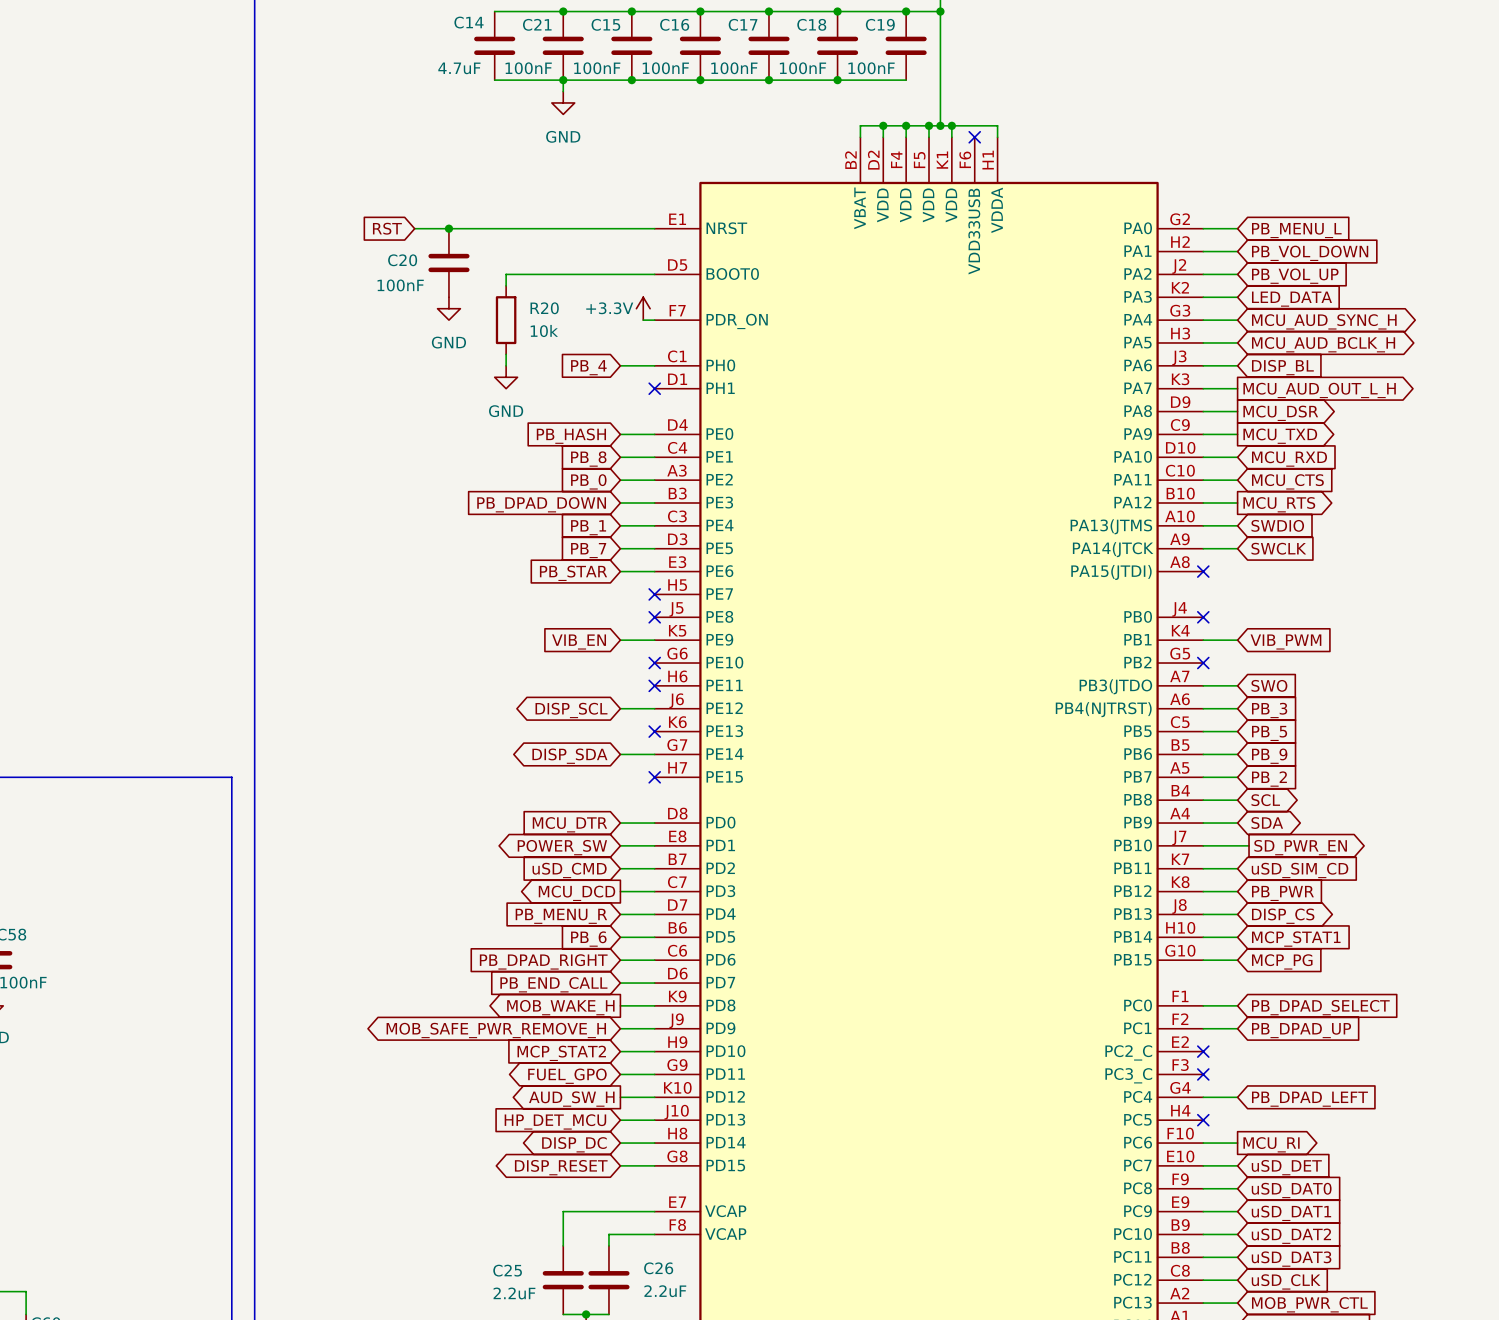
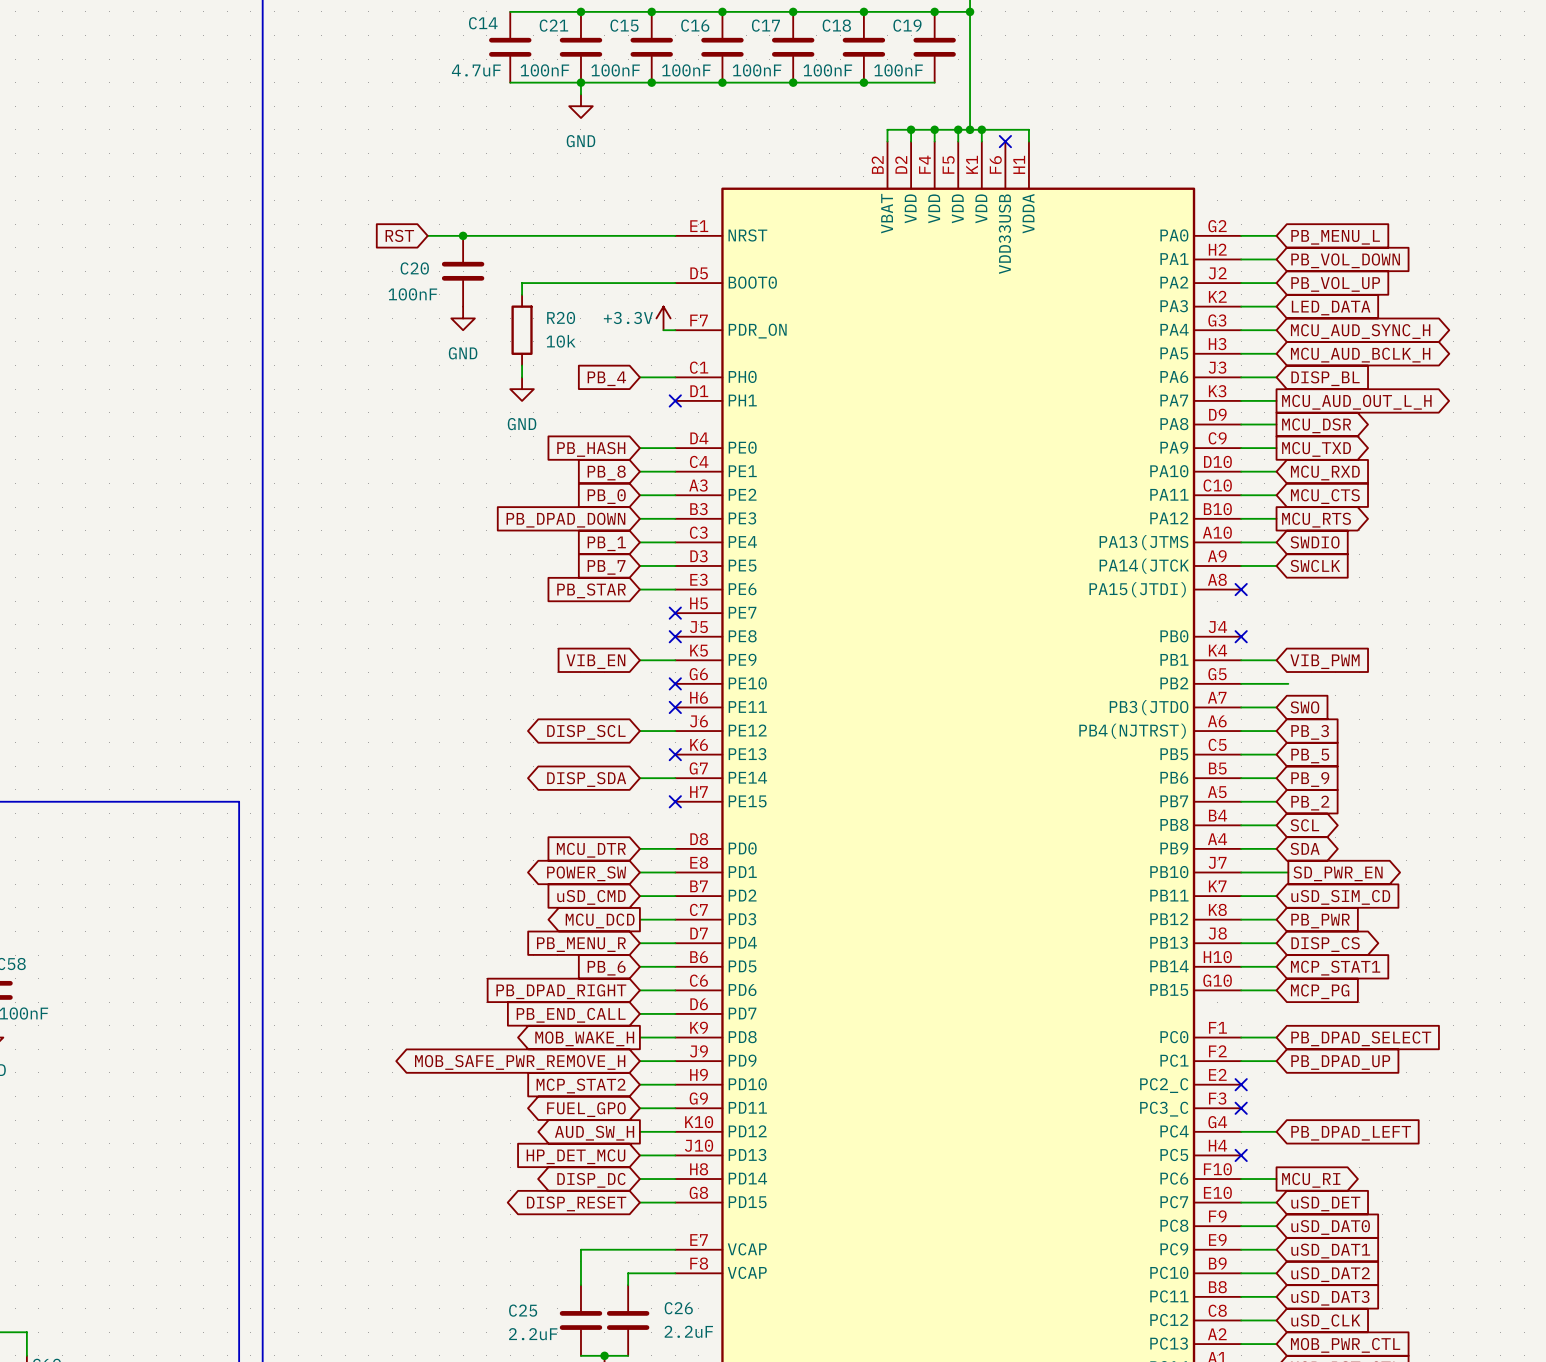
wire: none -> (1241, 683) (1288, 683)
no-connect mark: (1203, 663) -> none

